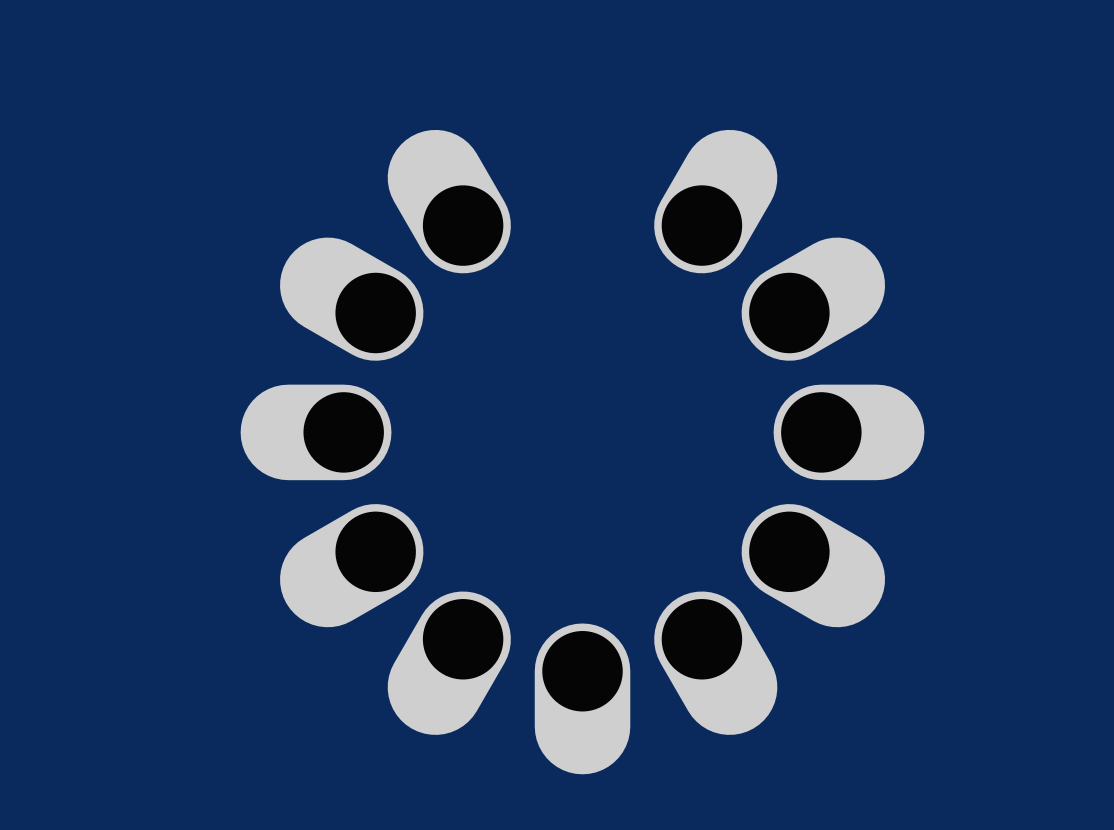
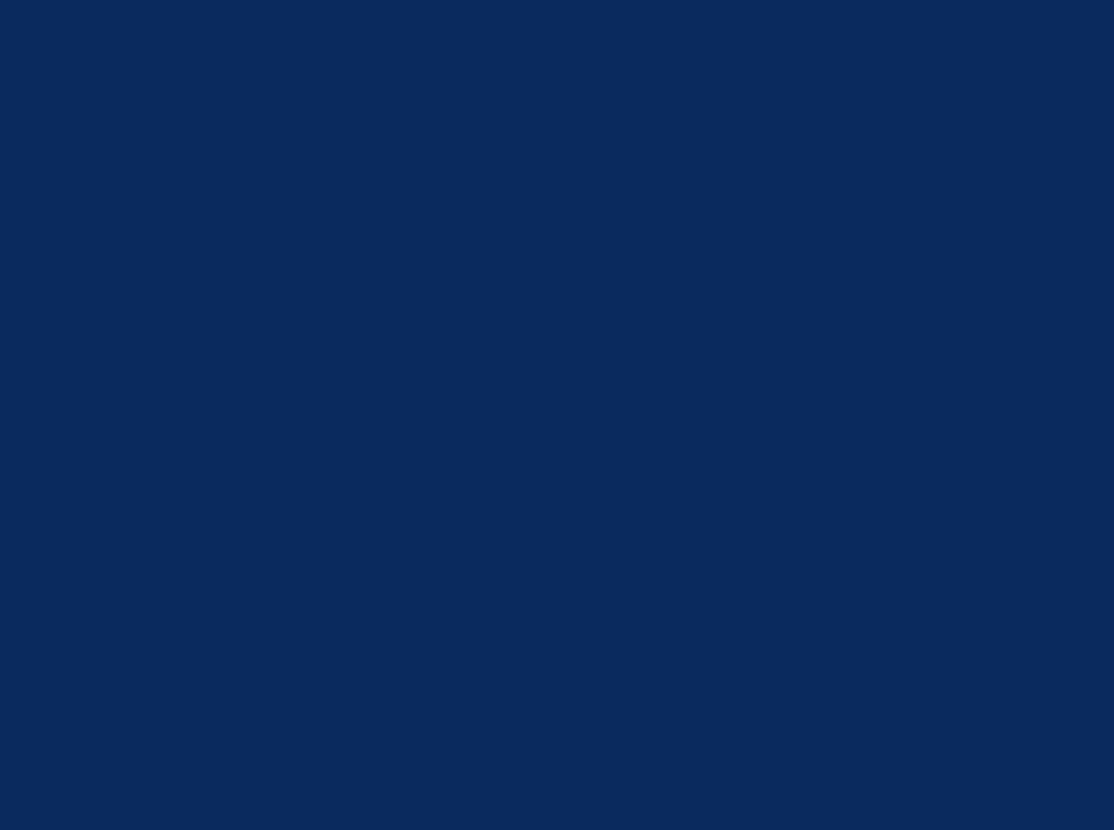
part: (582, 452) -> none

